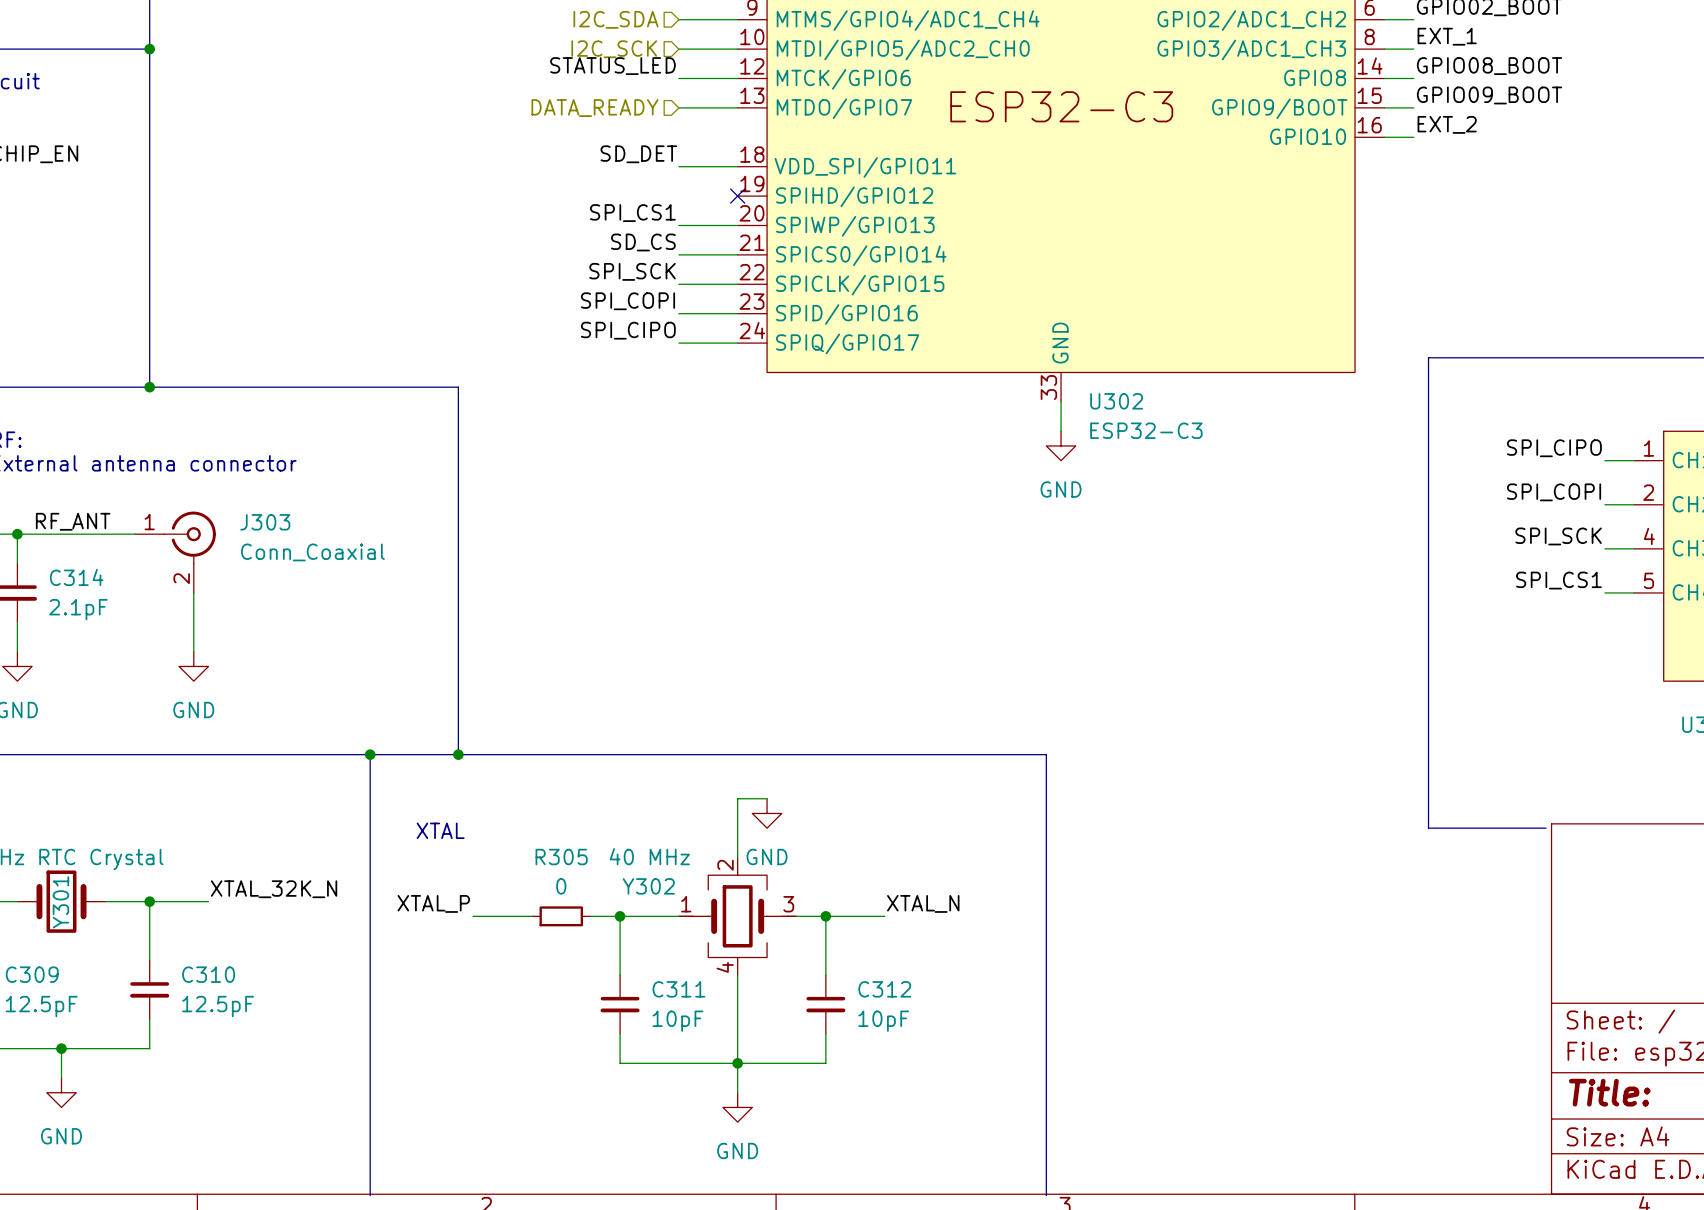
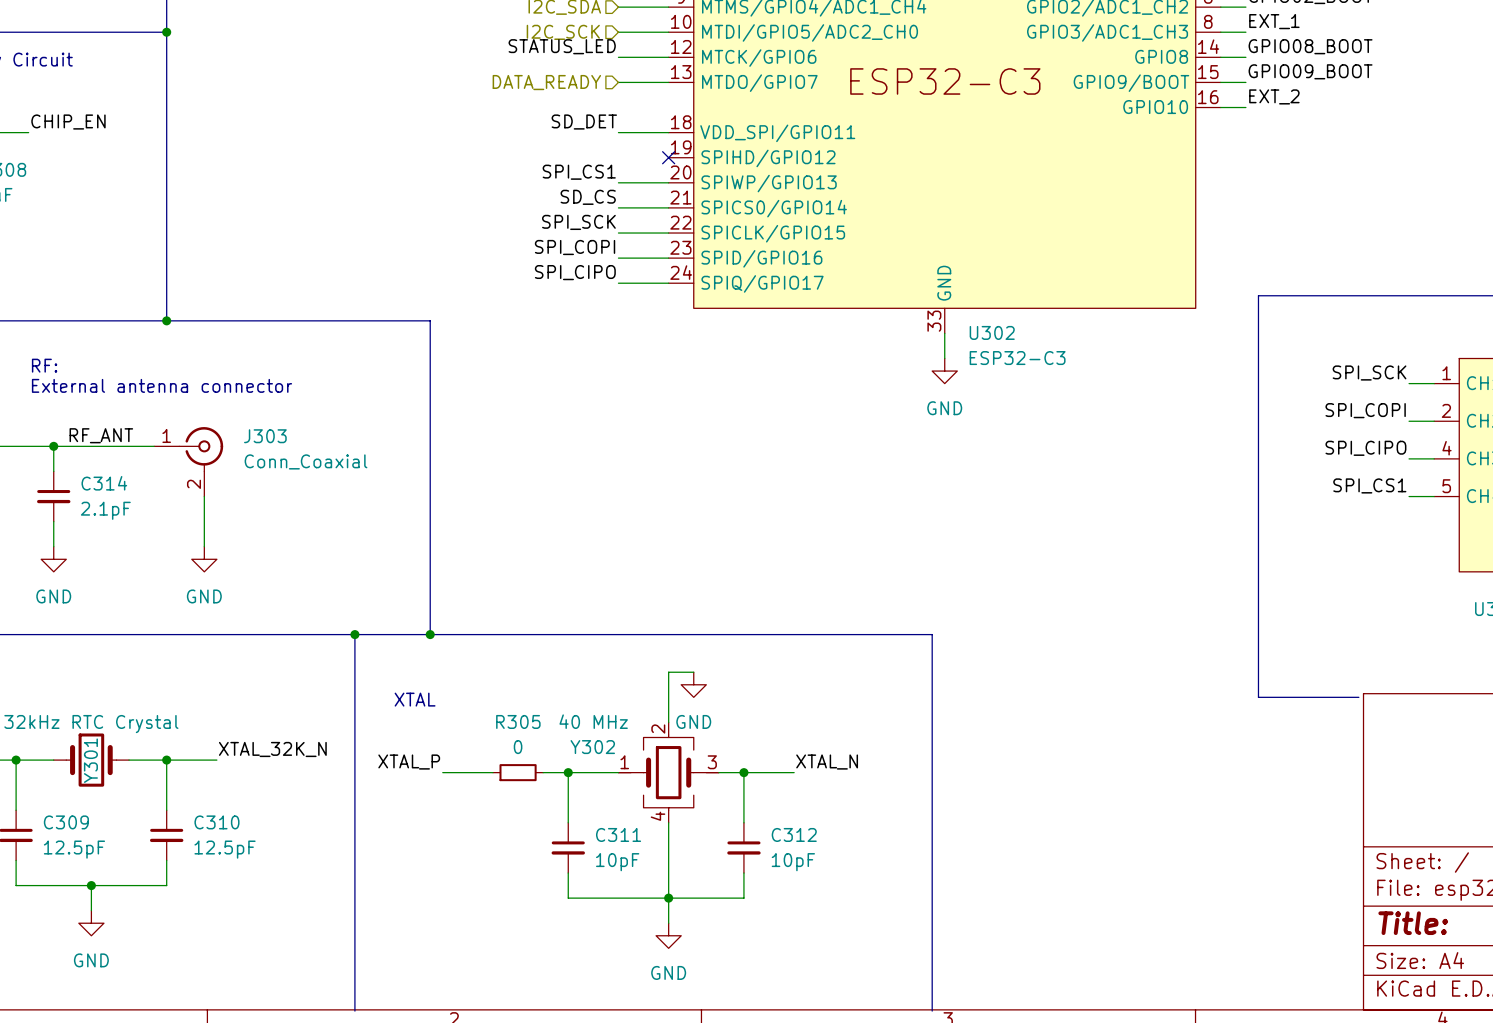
label: SPI_CIPO (1554, 448) -> SPI_SCK (1369, 373)
label: SPI_SCK (1558, 536) -> SPI_CIPO (1365, 448)

